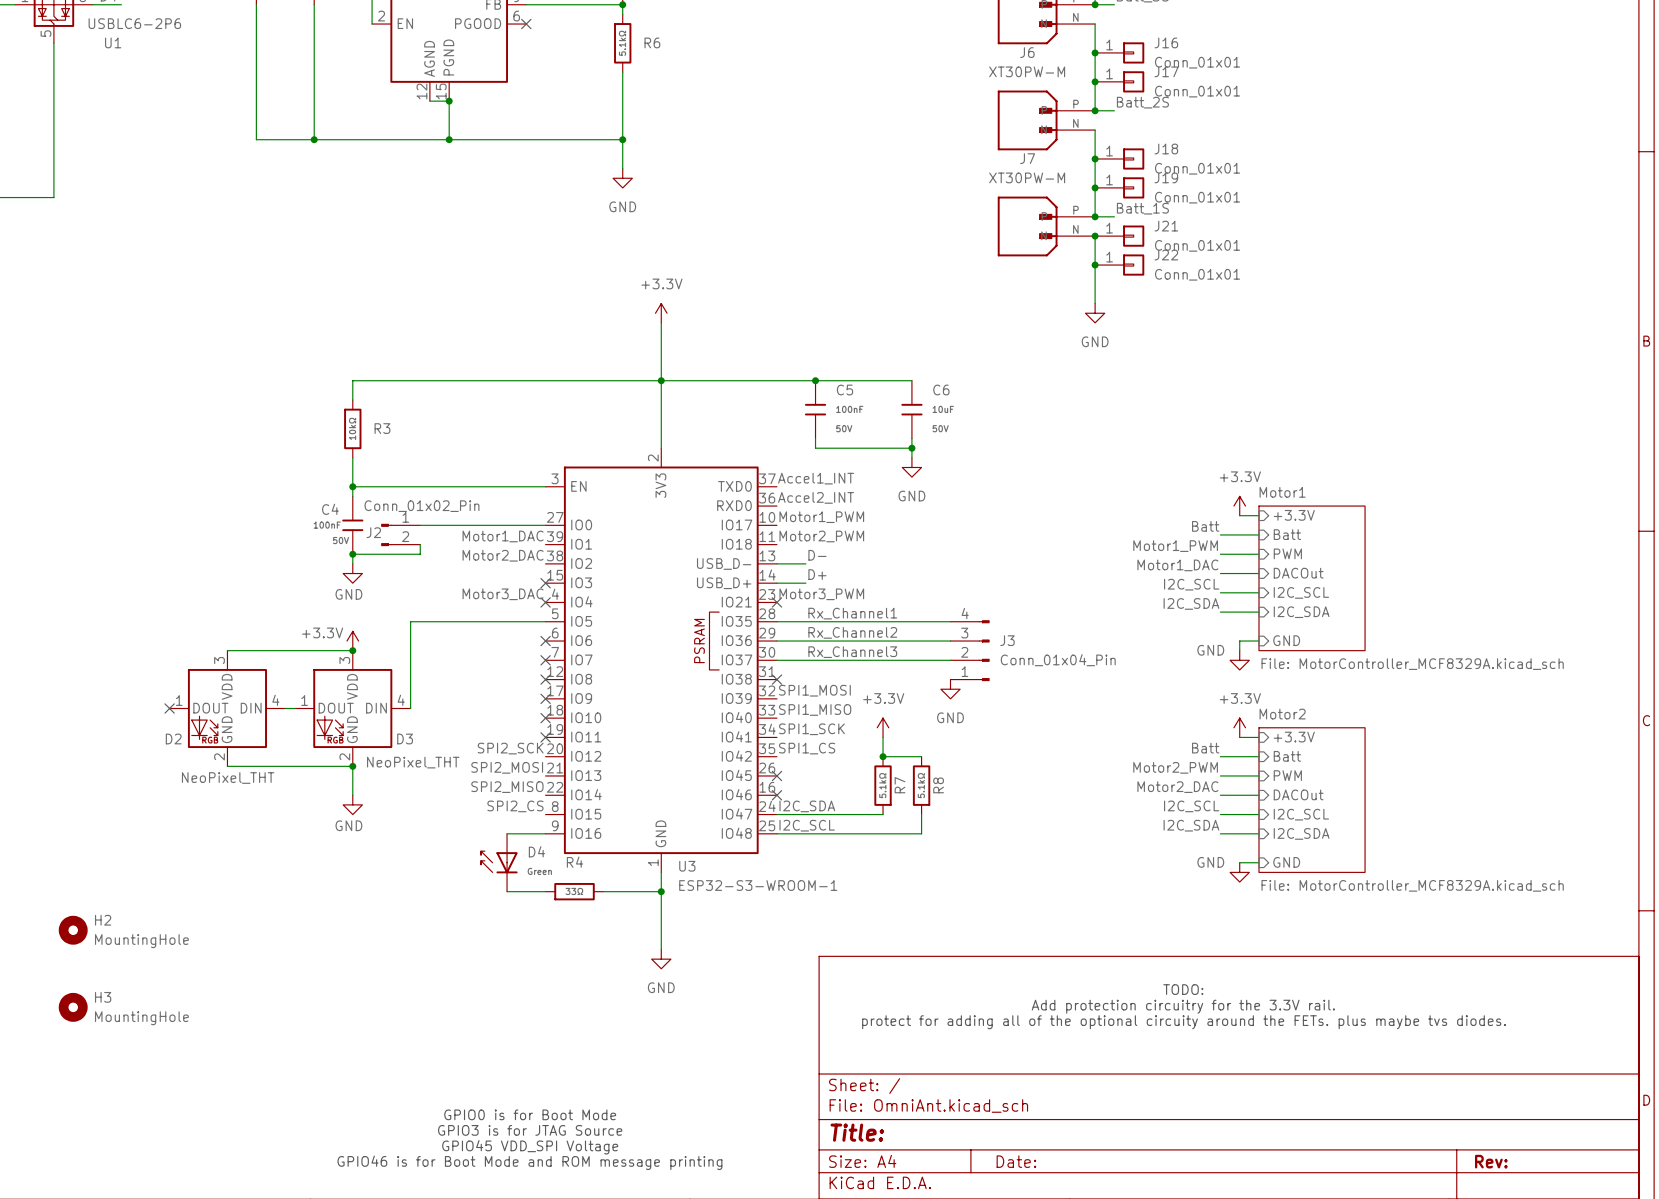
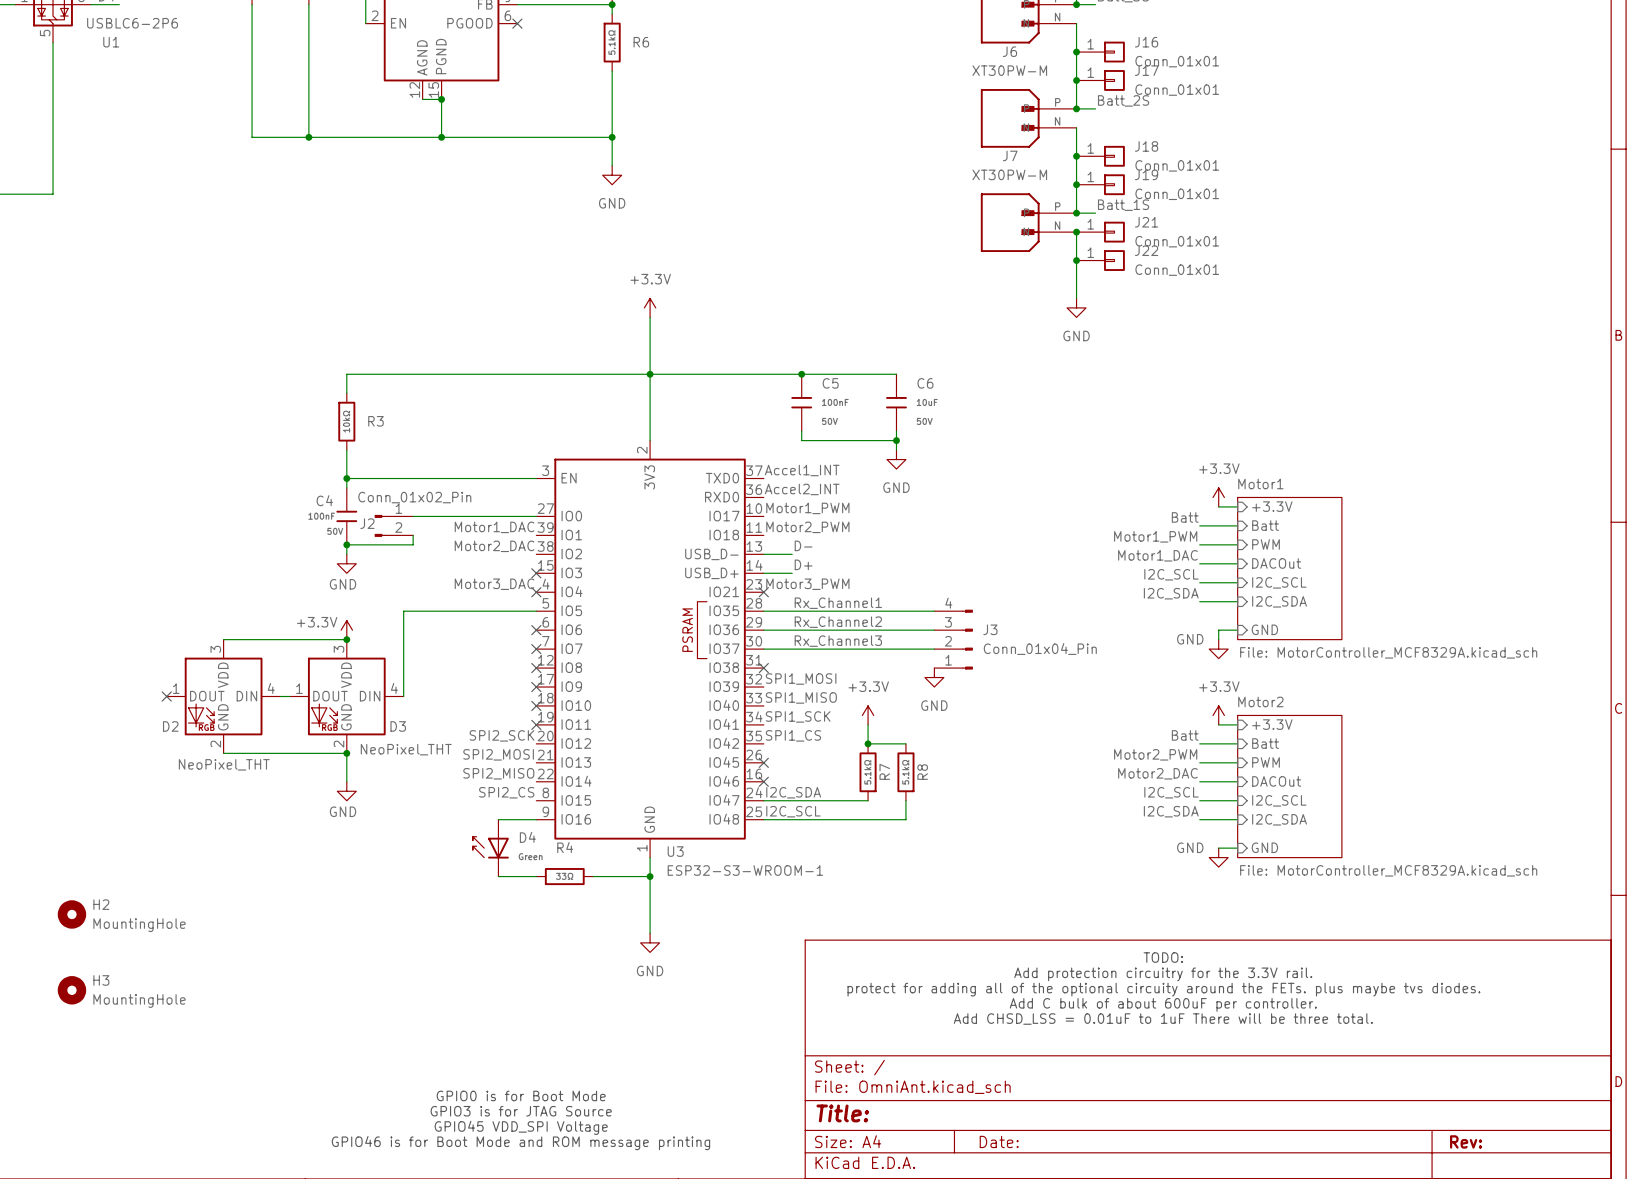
text: none -> TODO: (1163, 957)
text: TODO: (1183, 989) -> Add protection circuitry for the 3.3V rail. (1163, 974)
text: Add protection circuitry for the 3.3V rail. (1183, 1006) -> protect for adding all of the optional circuity around the FETs. plus maybe tvs diodes. (1163, 989)
text: protect for adding all of the optional circuity around the FETs. plus maybe tvs diodes. (1184, 1022) -> Add C bulk of about 600uF per controller. (1163, 1004)
text: none -> Add CHSD_LSS = 0.01uF to 1uF There will be three total. (1163, 1019)

